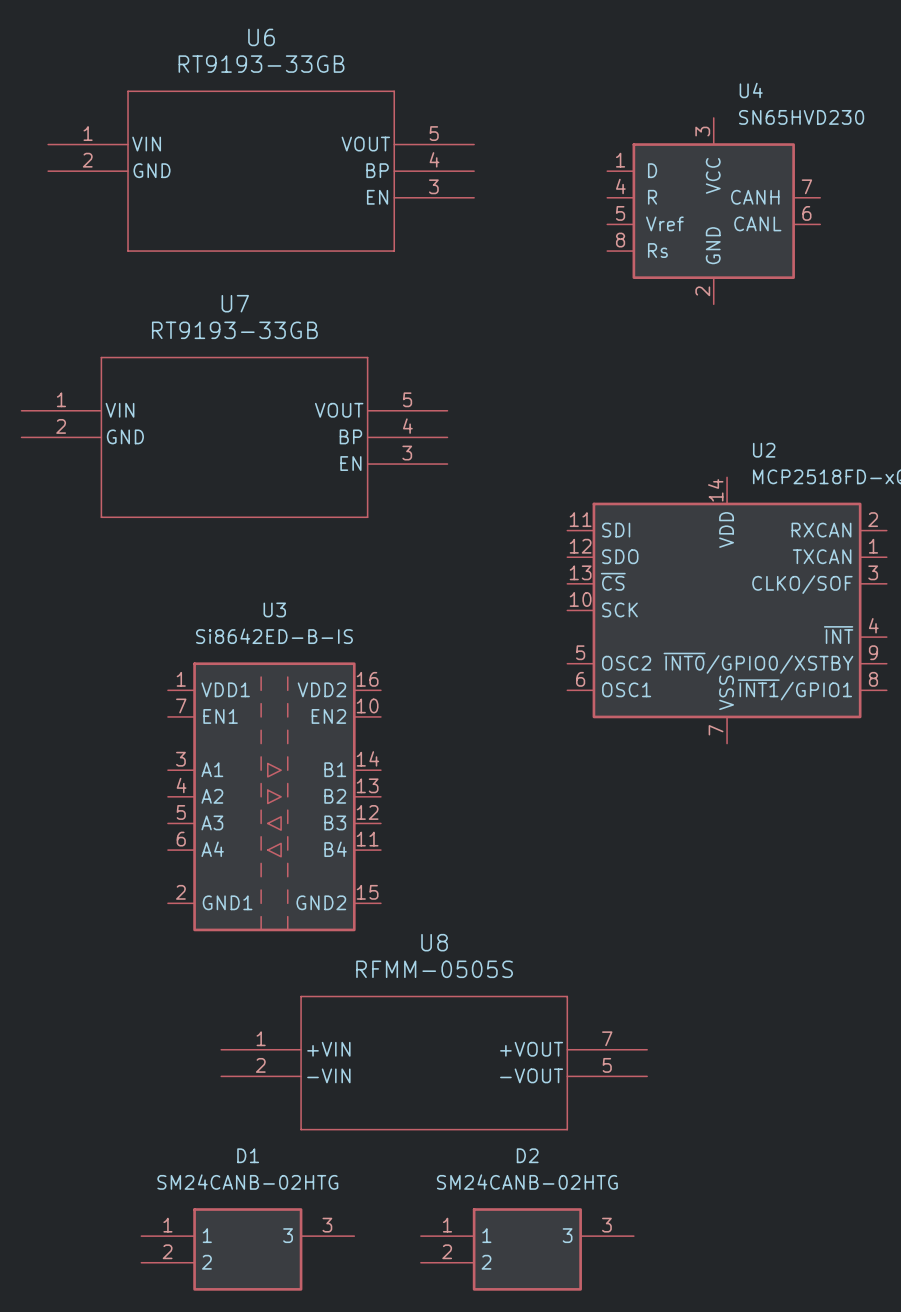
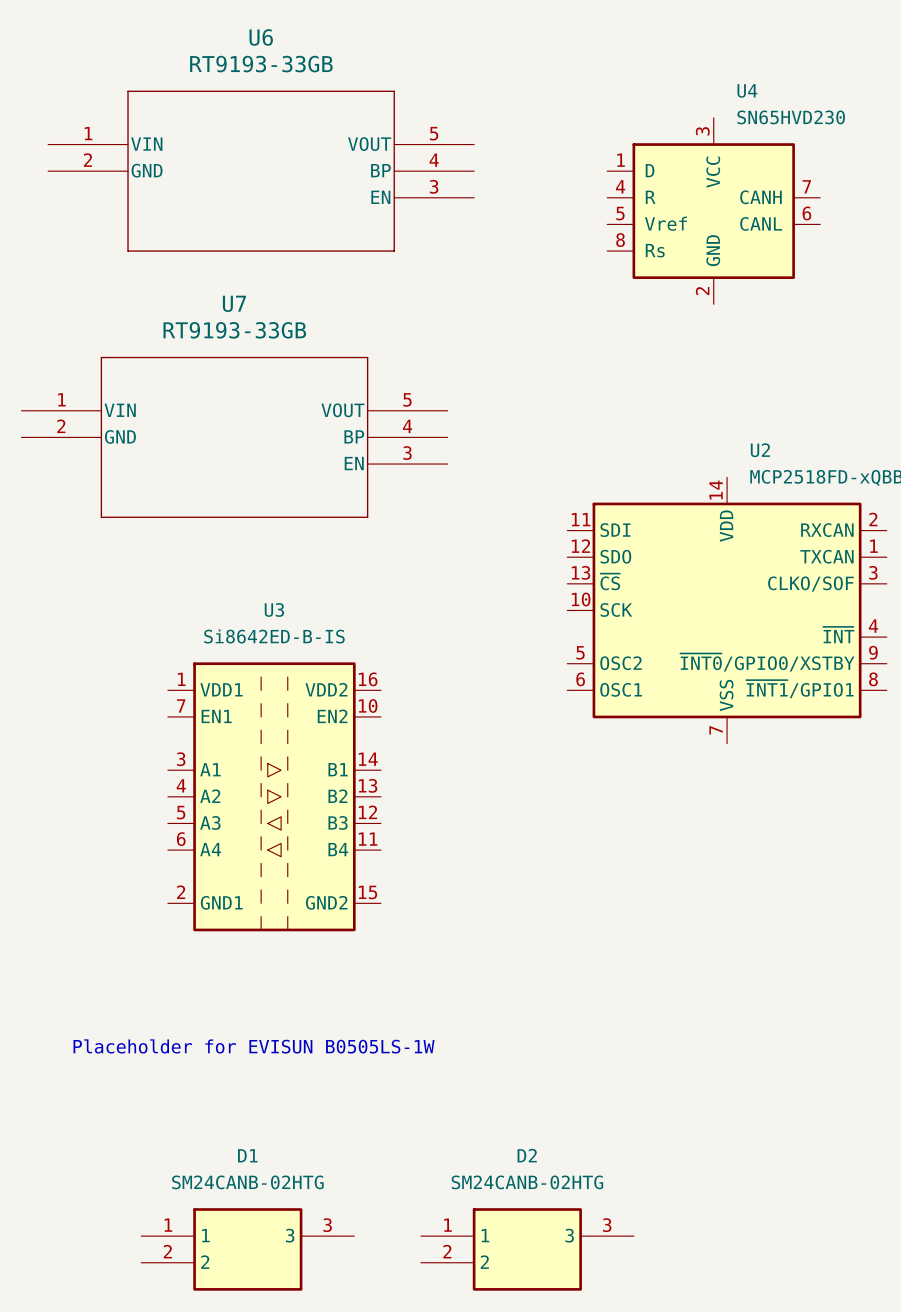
text: none -> Placeholder for EVISUN B0505LS-1W (254, 1046)
U8: RFMM-0505S (434, 1063) -> none

